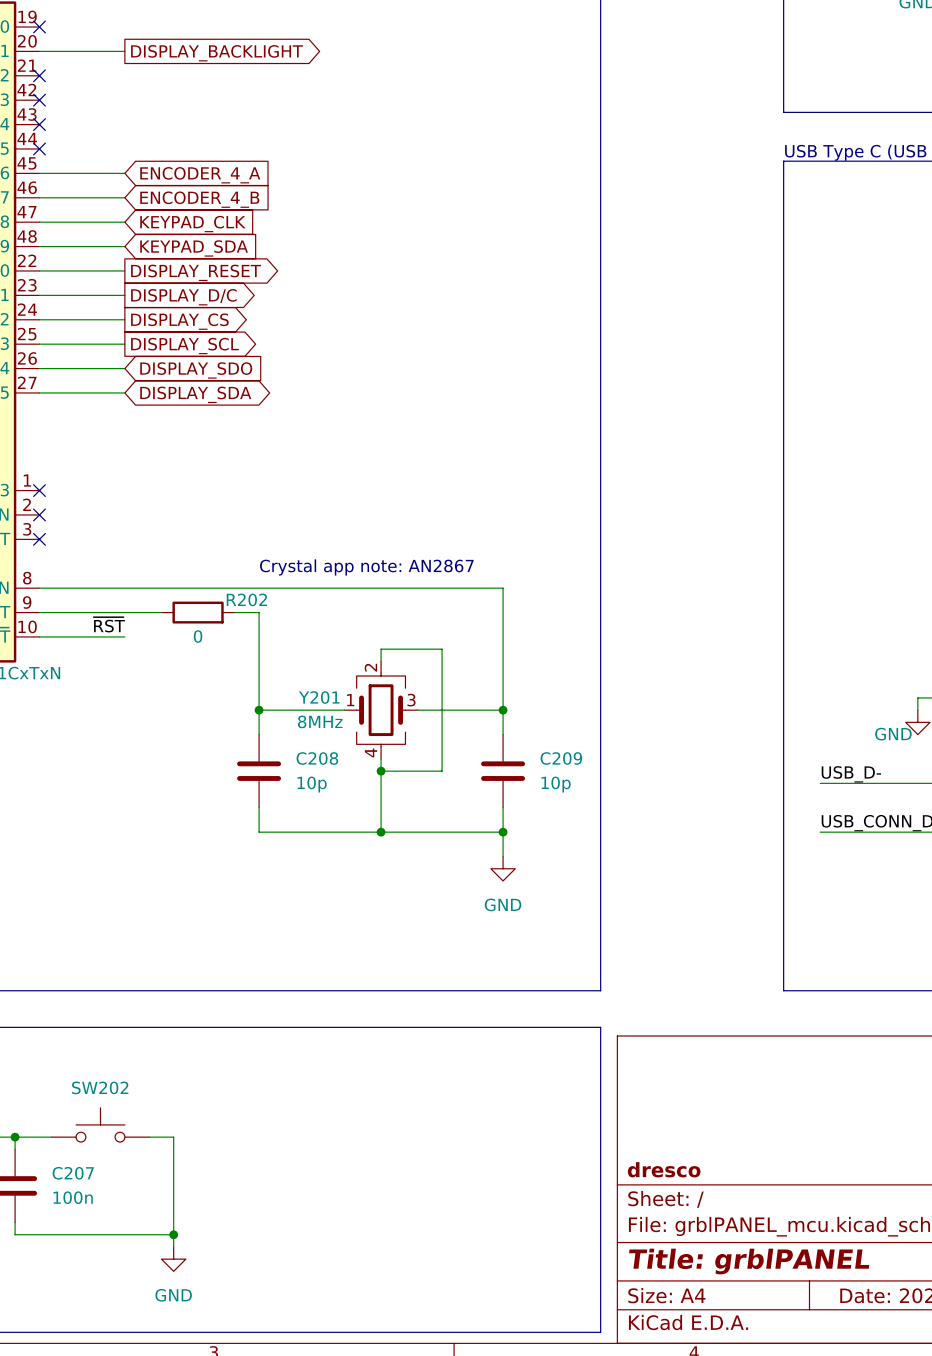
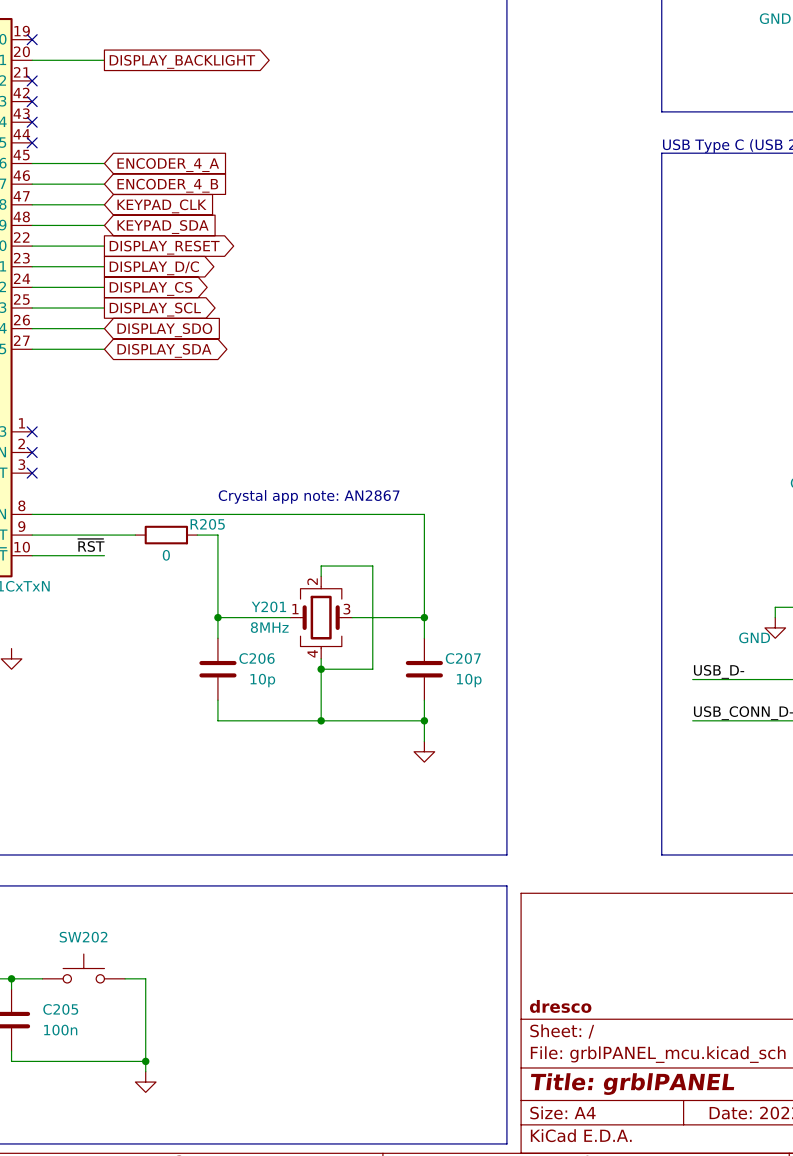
R202 name: R202 (246, 599) -> R205 (207, 524)
power symbol: none -> (11, 658)
C208 name: C208 (317, 758) -> C206 (257, 658)
C209 name: C209 (561, 758) -> C207 (463, 658)
power symbol text: GND (503, 904) -> none
C207 name: C207 (73, 1173) -> C205 (60, 1009)
power symbol text: GND (173, 1295) -> none

